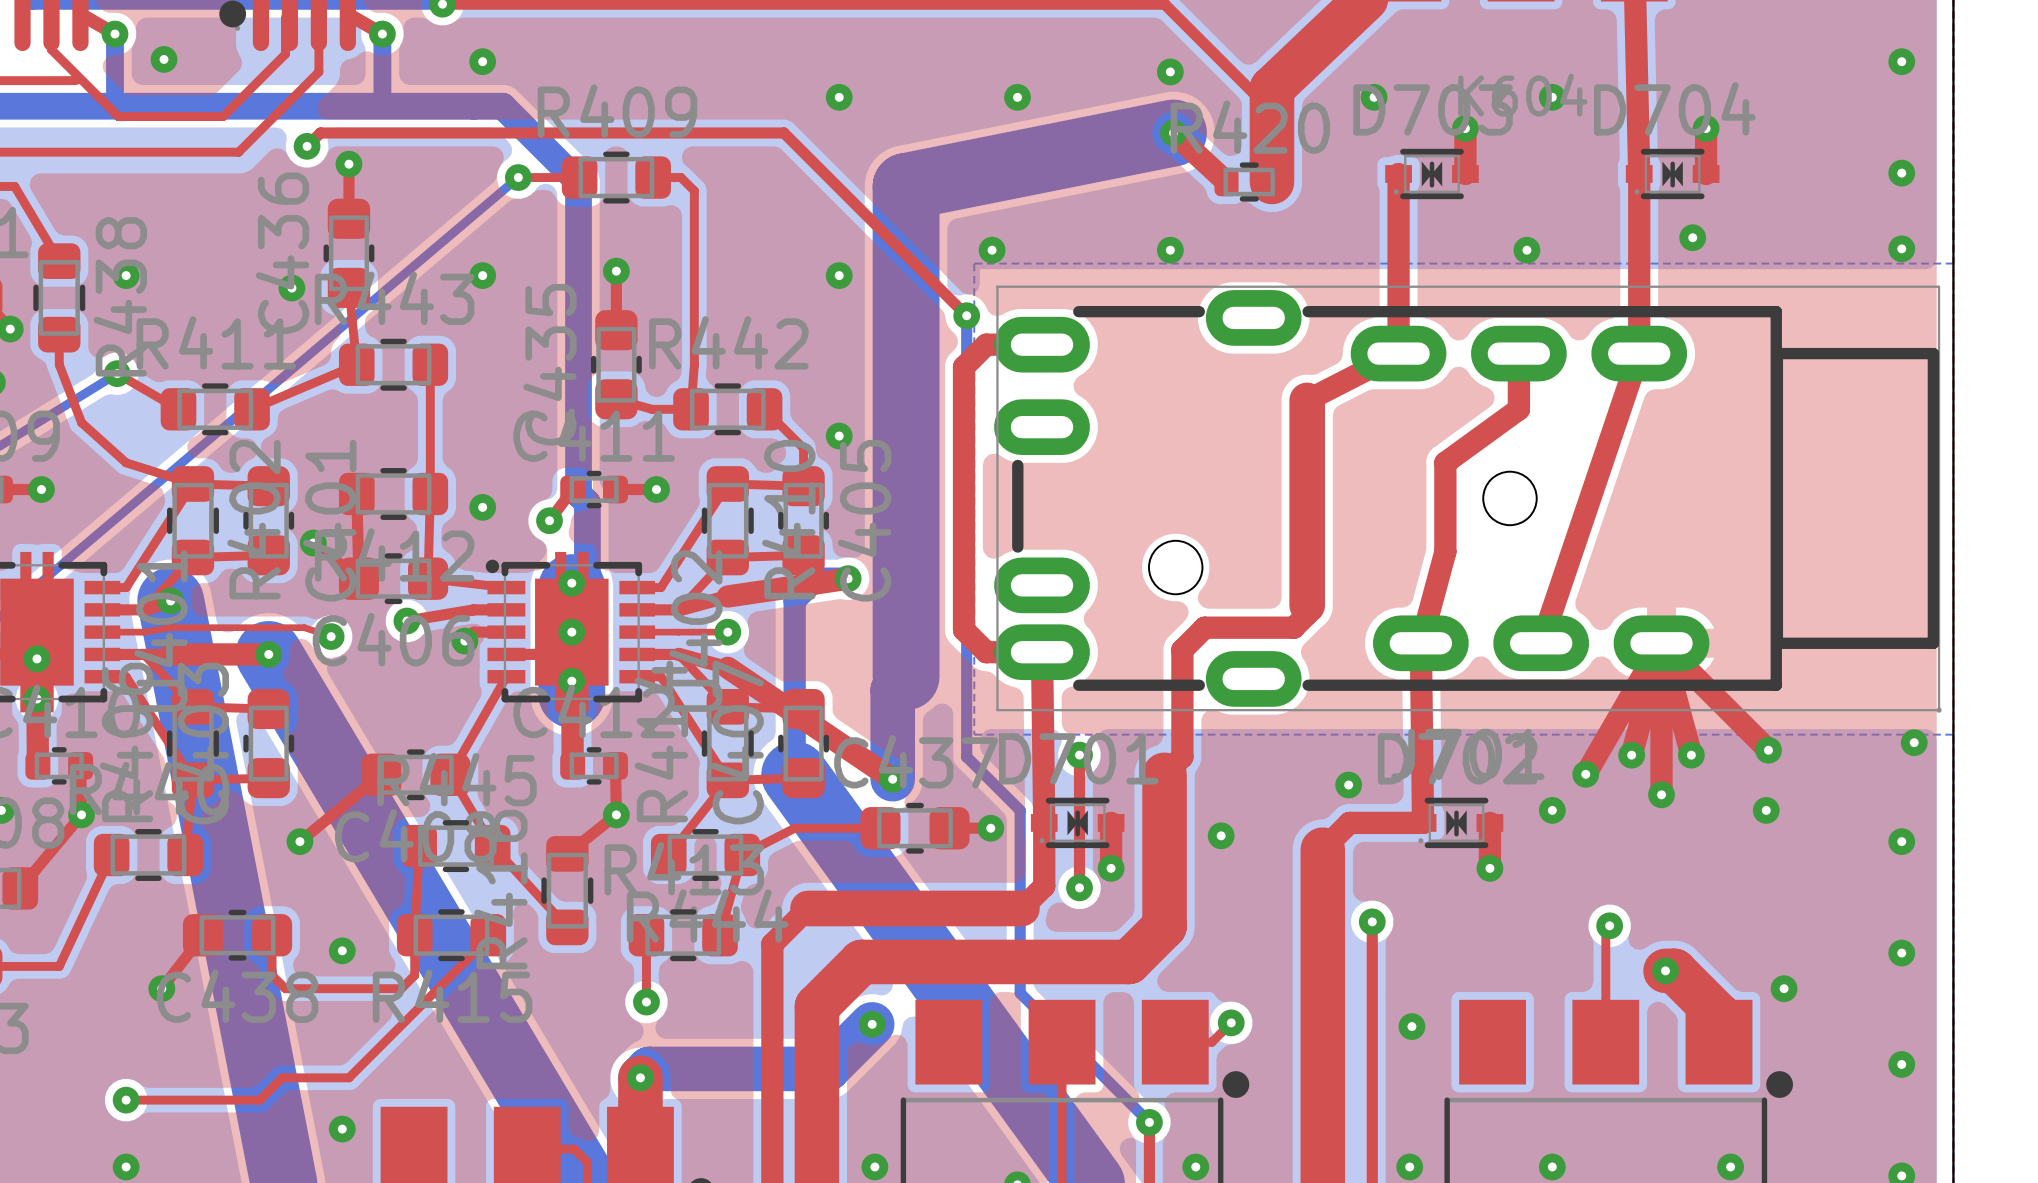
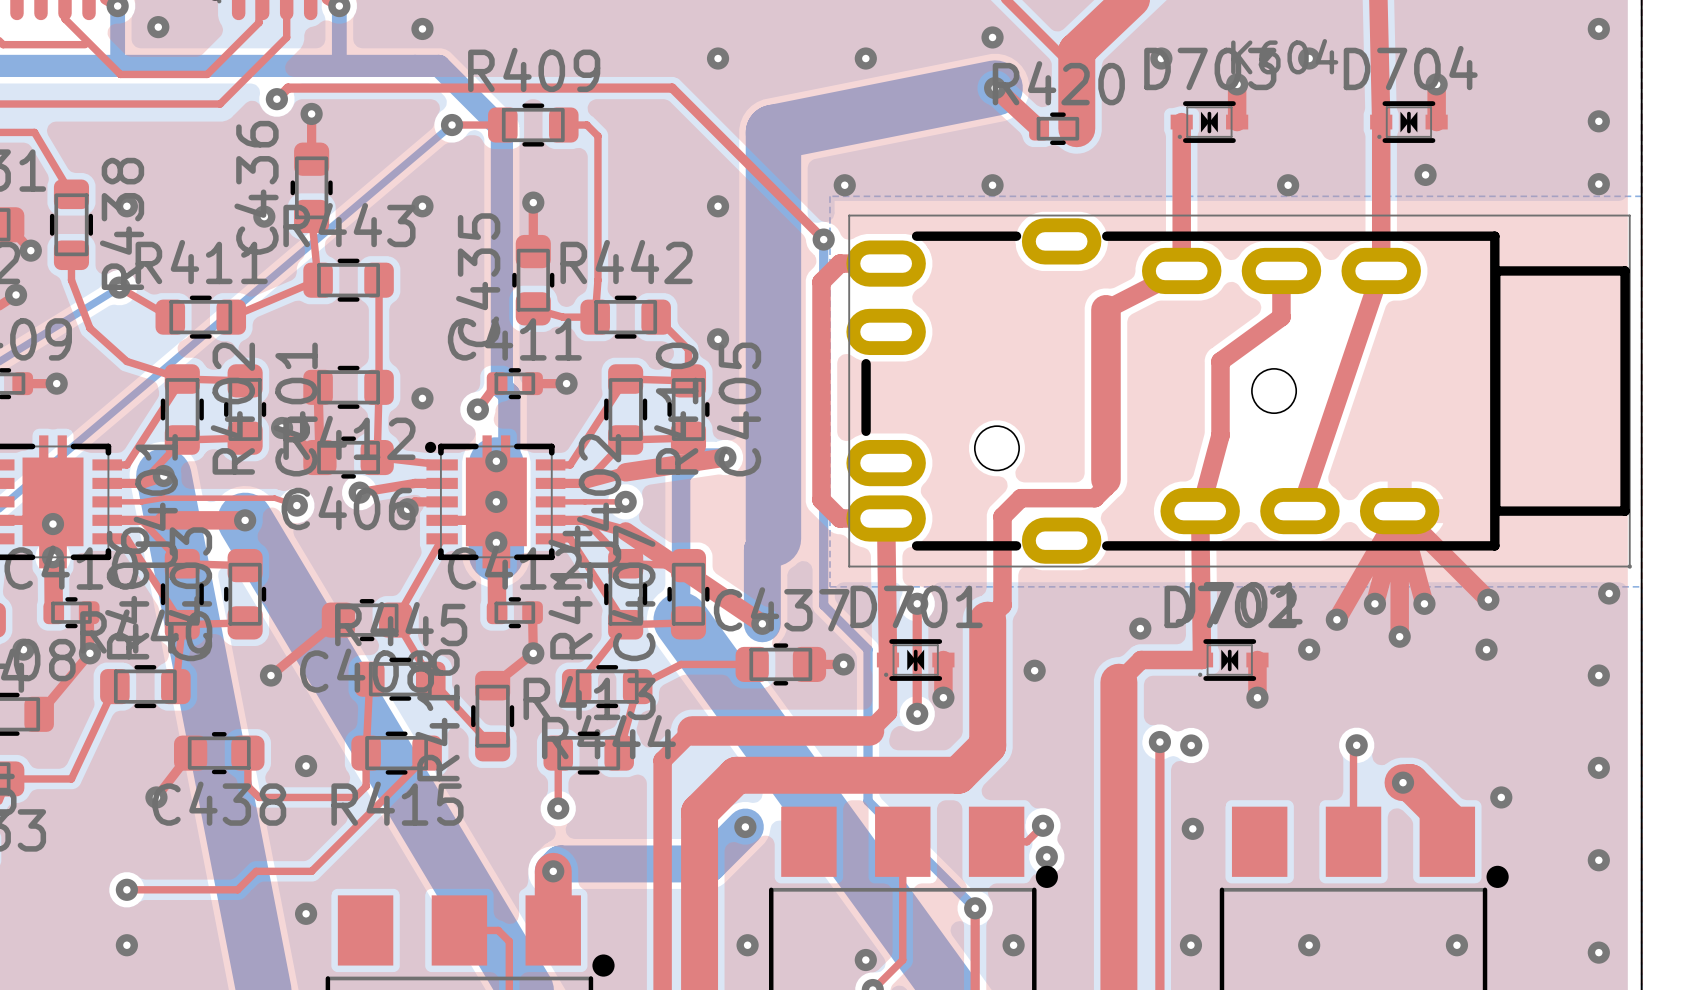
via: none -> (1191, 745)
via: none -> (1046, 856)

